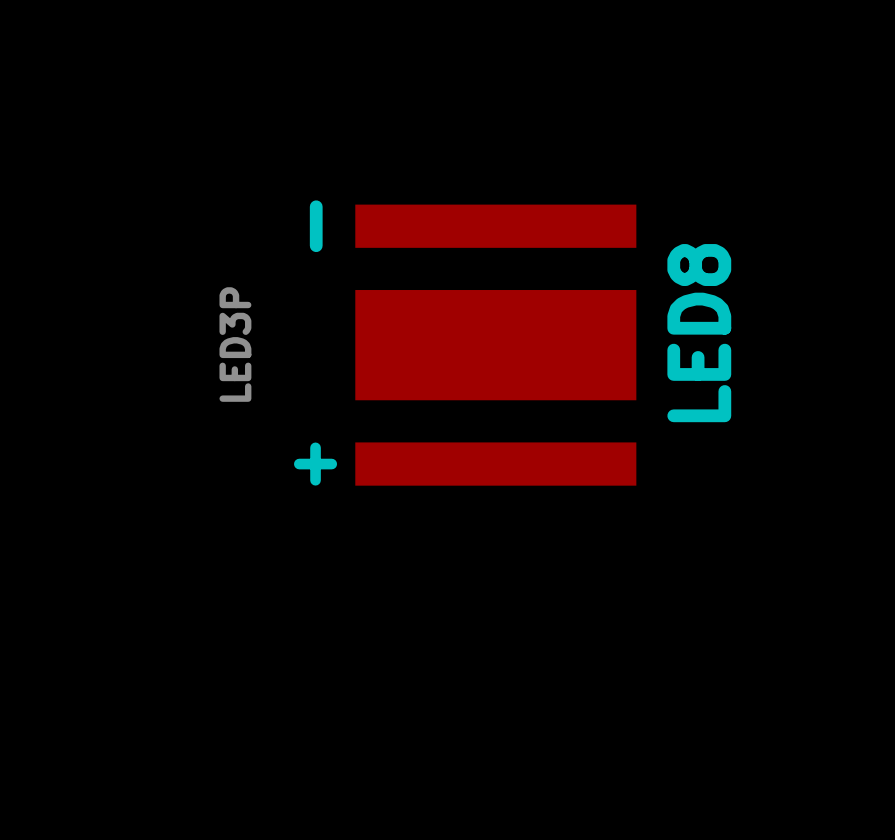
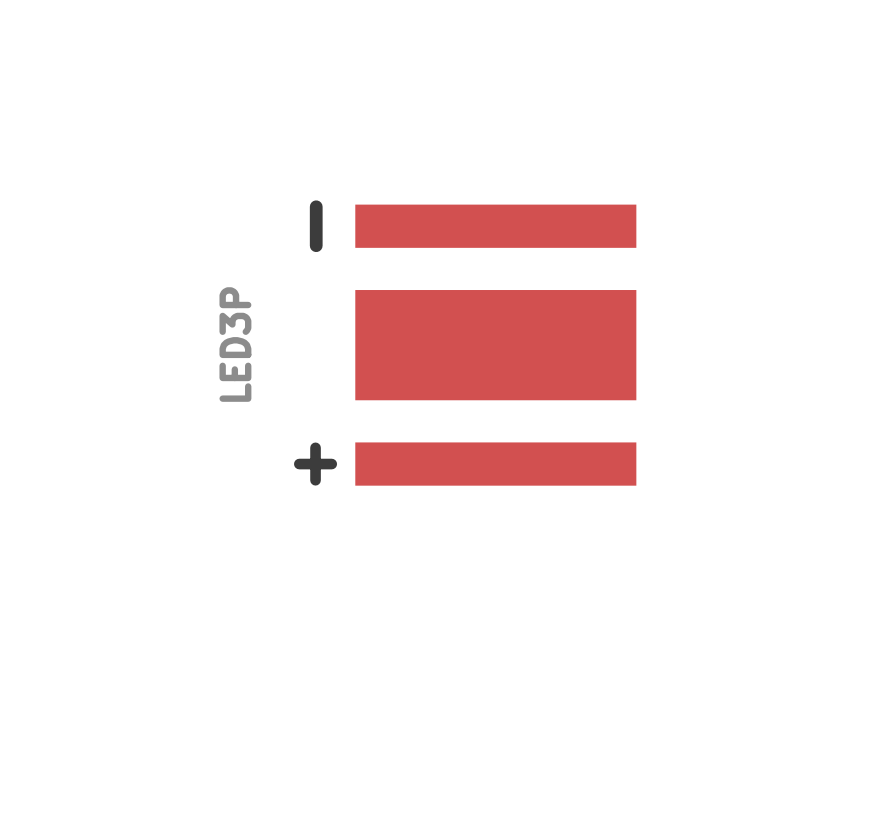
LED8 name: LED8 (699, 333) -> none

